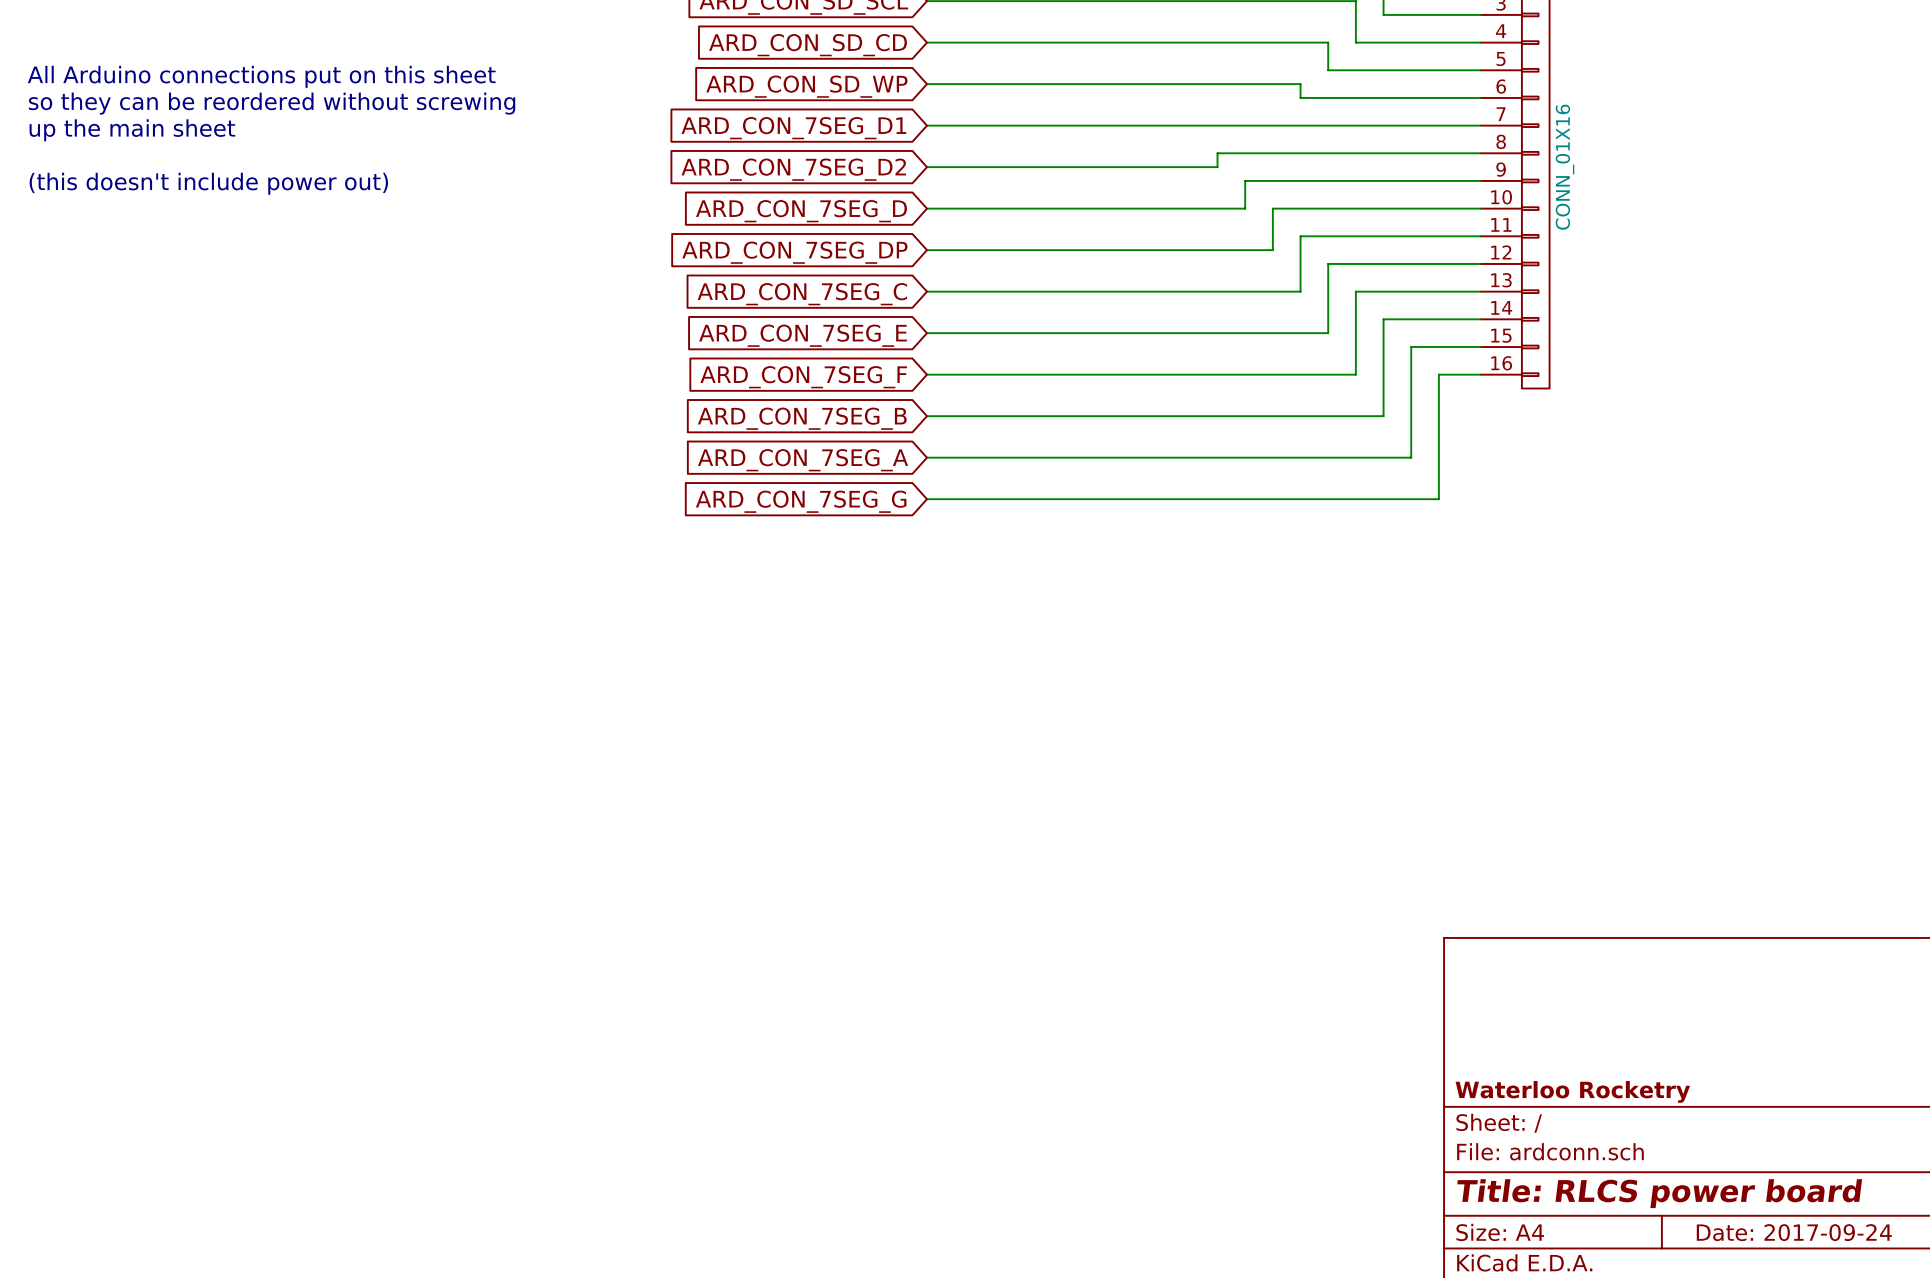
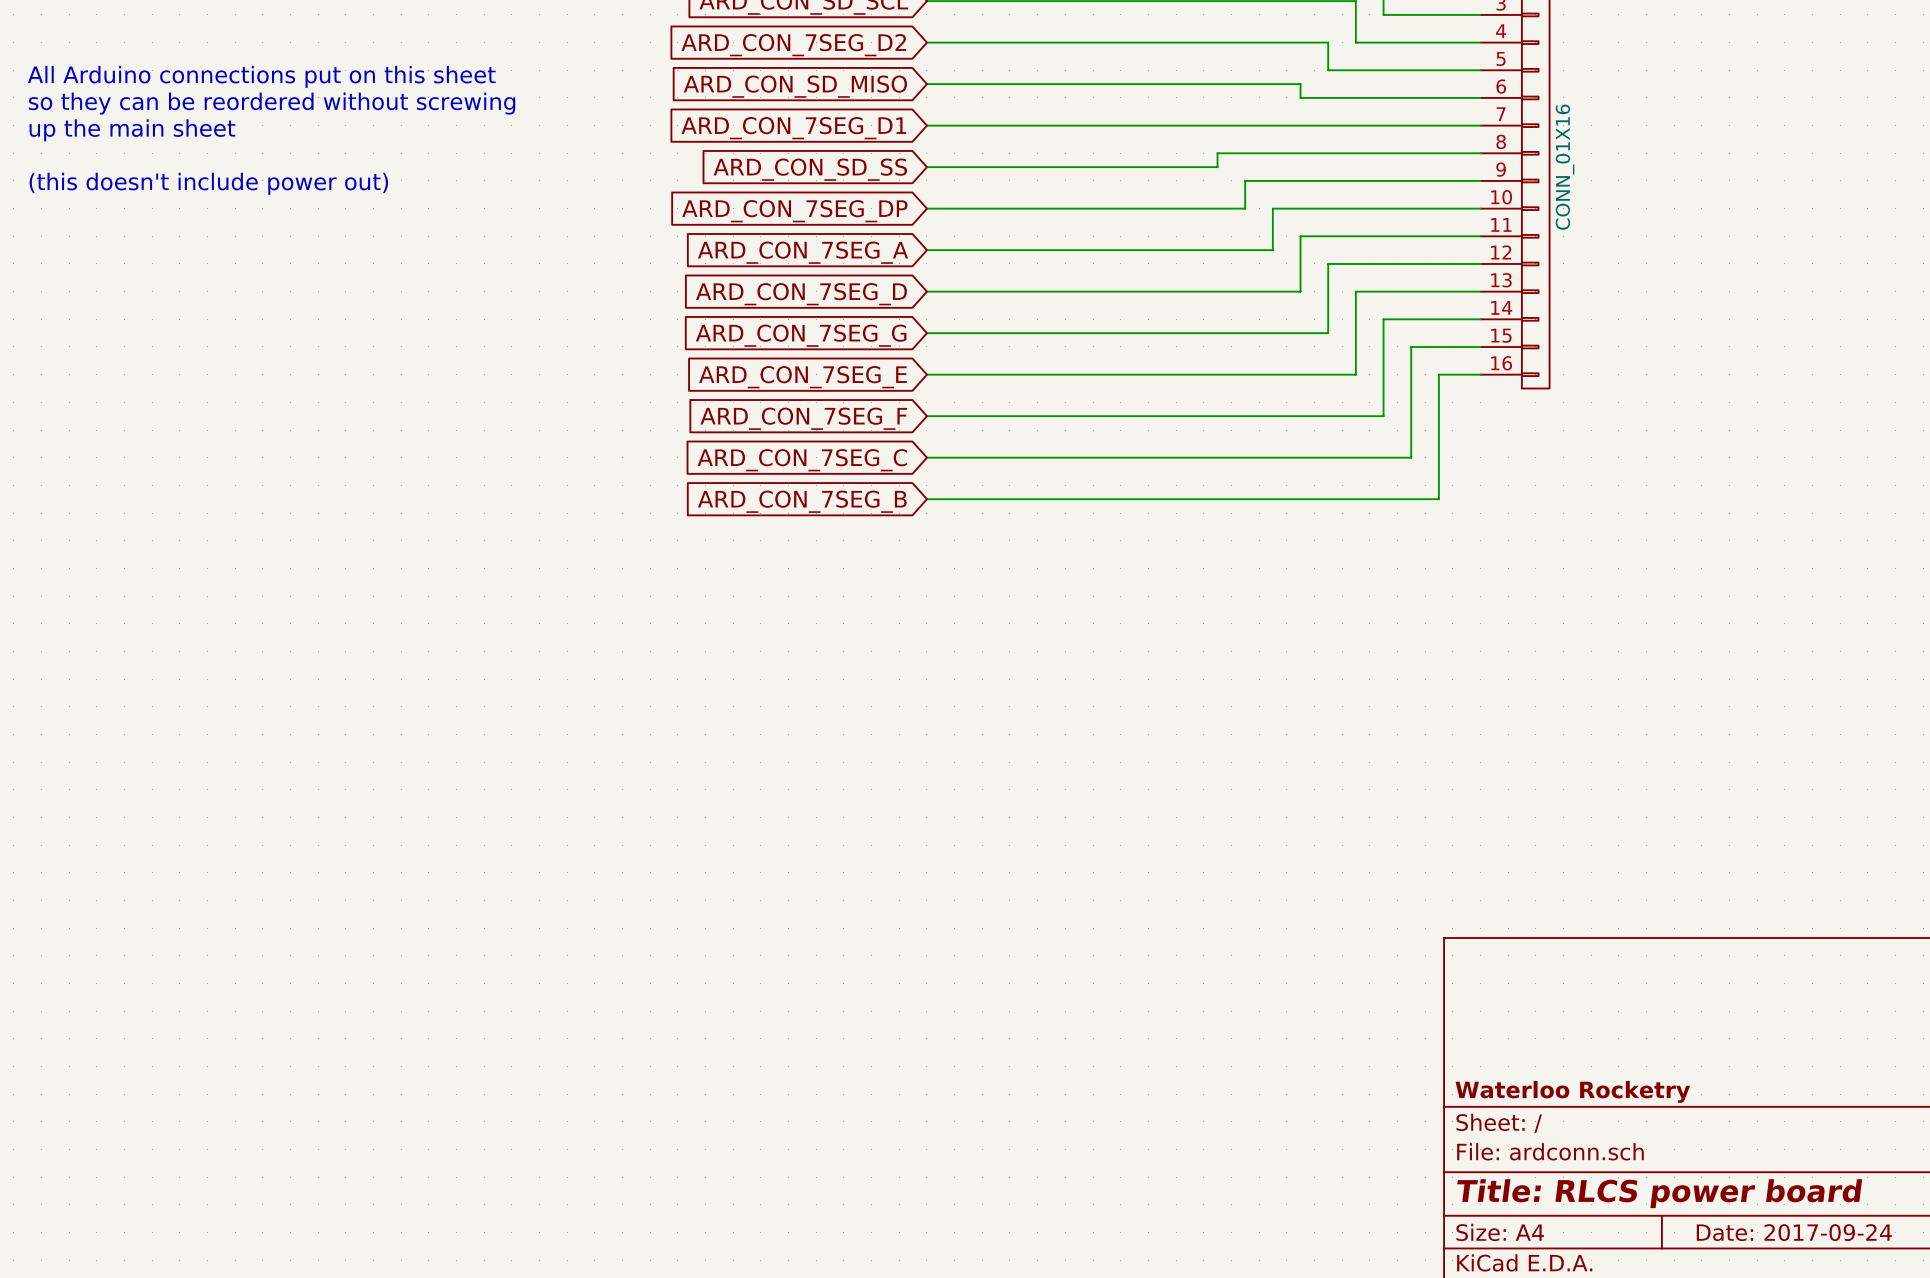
global label: ARD_CON_SD_CD (808, 45) -> ARD_CON_7SEG_D2 (793, 45)
global label: ARD_CON_SD_WP (806, 86) -> ARD_CON_SD_MISO (795, 86)
global label: ARD_CON_7SEG_D2 (793, 169) -> ARD_CON_SD_SS (810, 169)
global label: ARD_CON_7SEG_D (801, 211) -> ARD_CON_7SEG_DP (794, 211)
global label: ARD_CON_7SEG_DP (794, 252) -> ARD_CON_7SEG_A (803, 252)
global label: ARD_CON_7SEG_C (802, 294) -> ARD_CON_7SEG_D (801, 294)
global label: ARD_CON_7SEG_E (802, 335) -> ARD_CON_7SEG_G (801, 335)
global label: ARD_CON_7SEG_F (803, 377) -> ARD_CON_7SEG_E (802, 377)
global label: ARD_CON_7SEG_B (802, 418) -> ARD_CON_7SEG_F (803, 418)
global label: ARD_CON_7SEG_A (803, 460) -> ARD_CON_7SEG_C (802, 460)
global label: ARD_CON_7SEG_G (801, 501) -> ARD_CON_7SEG_B (802, 501)

